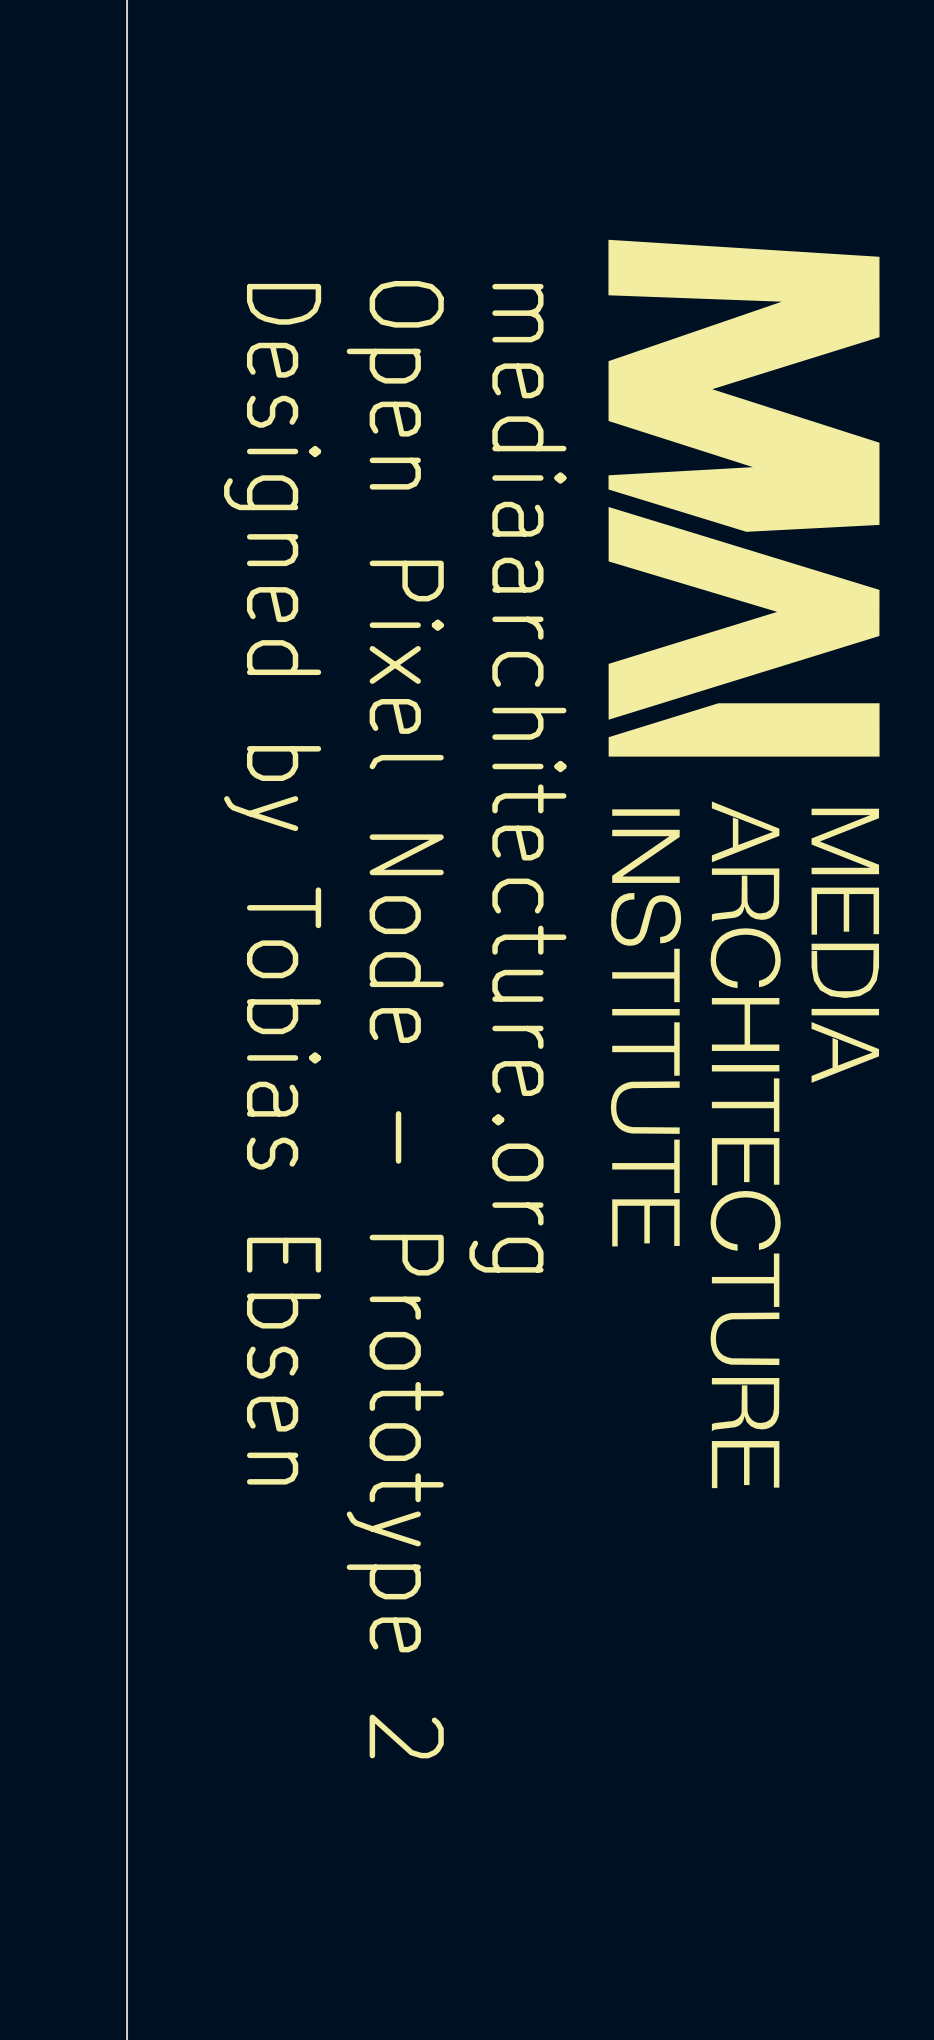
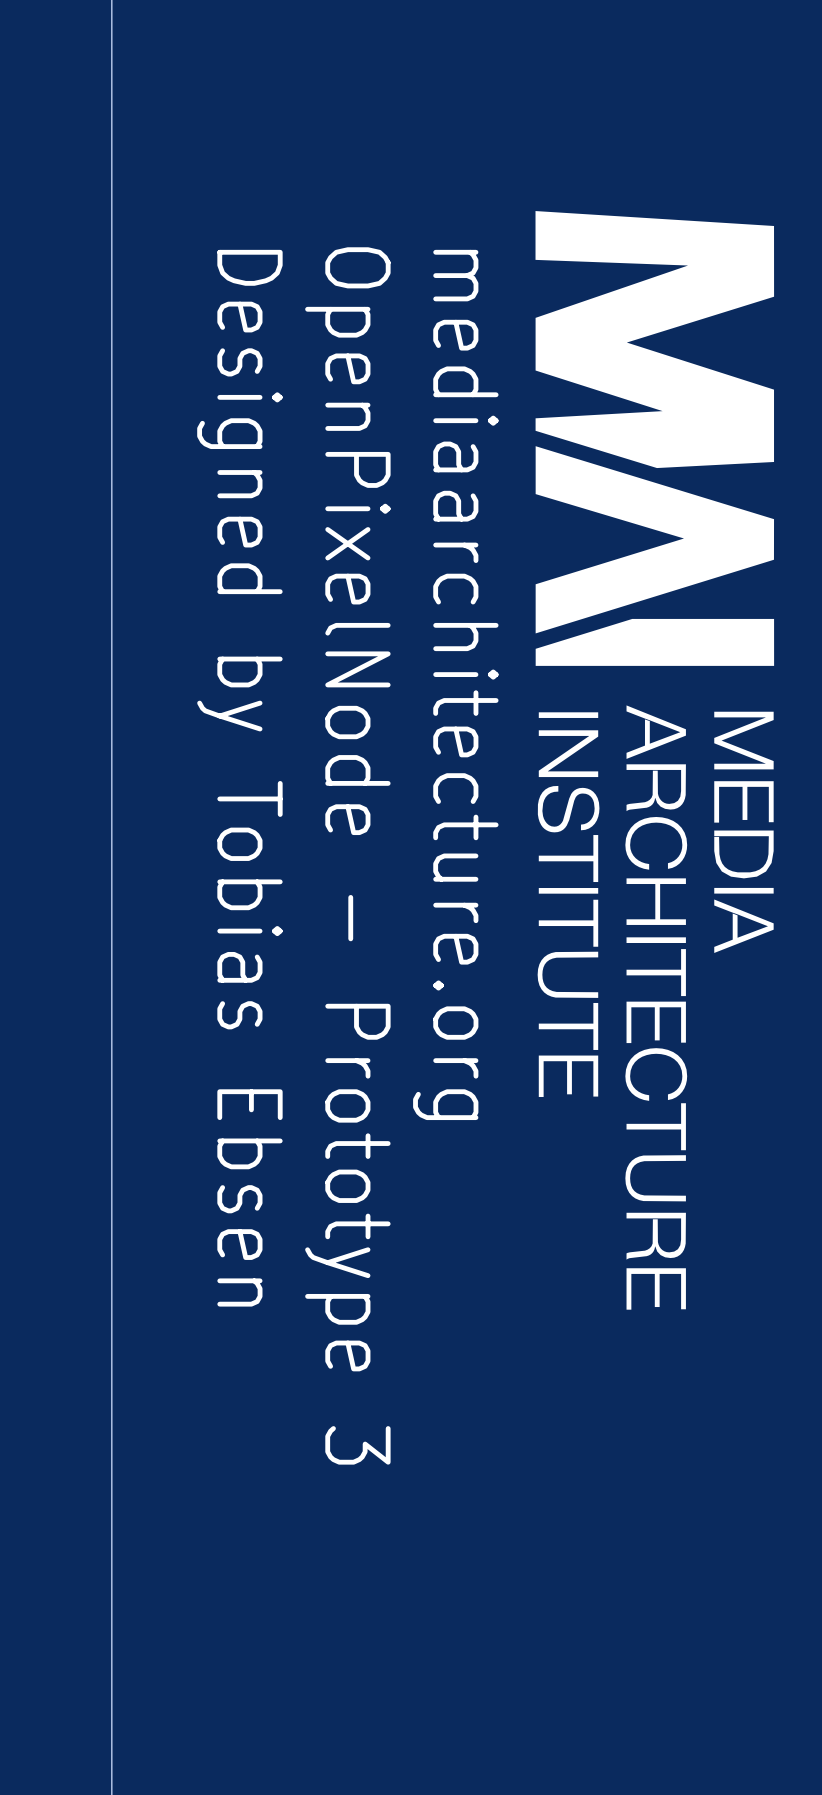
text: Open Pixel Node - Prototype 2 (395, 1019) -> OpenPixelNode - Prototype 3 (347, 855)

